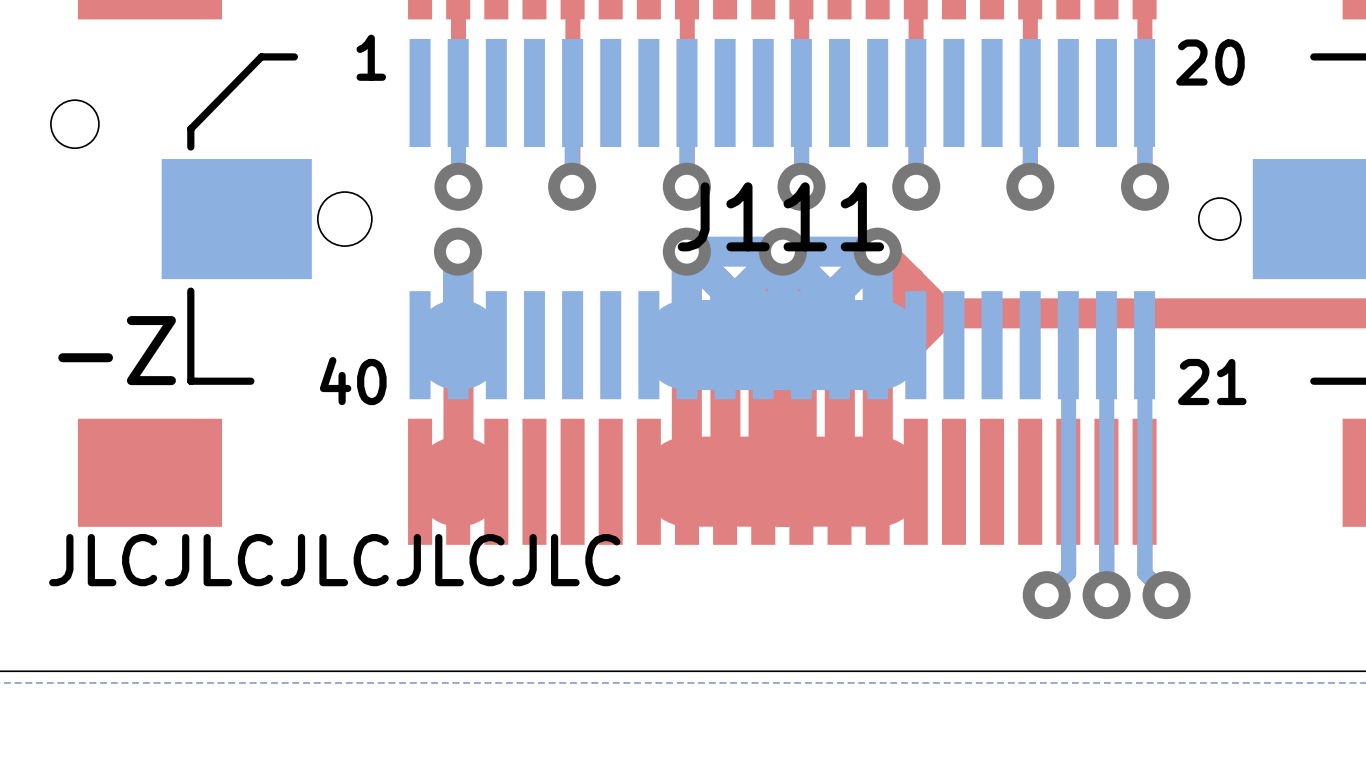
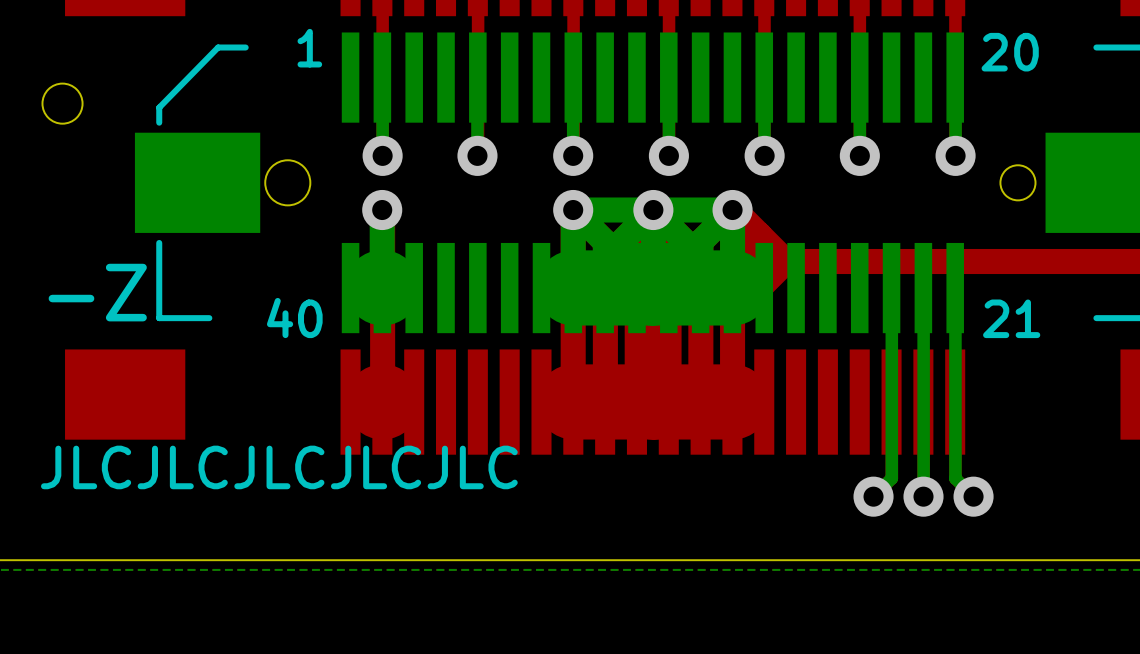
J111 name: J111 (780, 216) -> none

